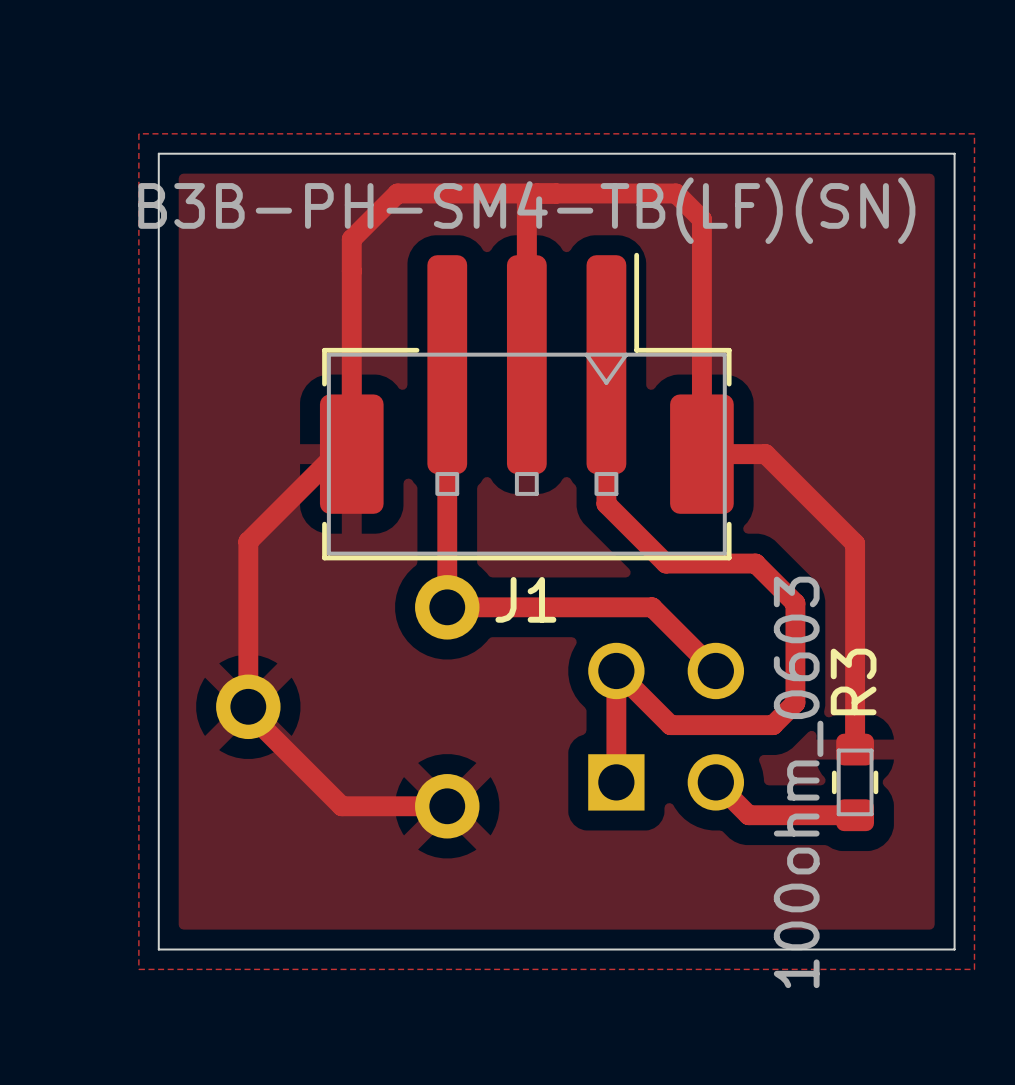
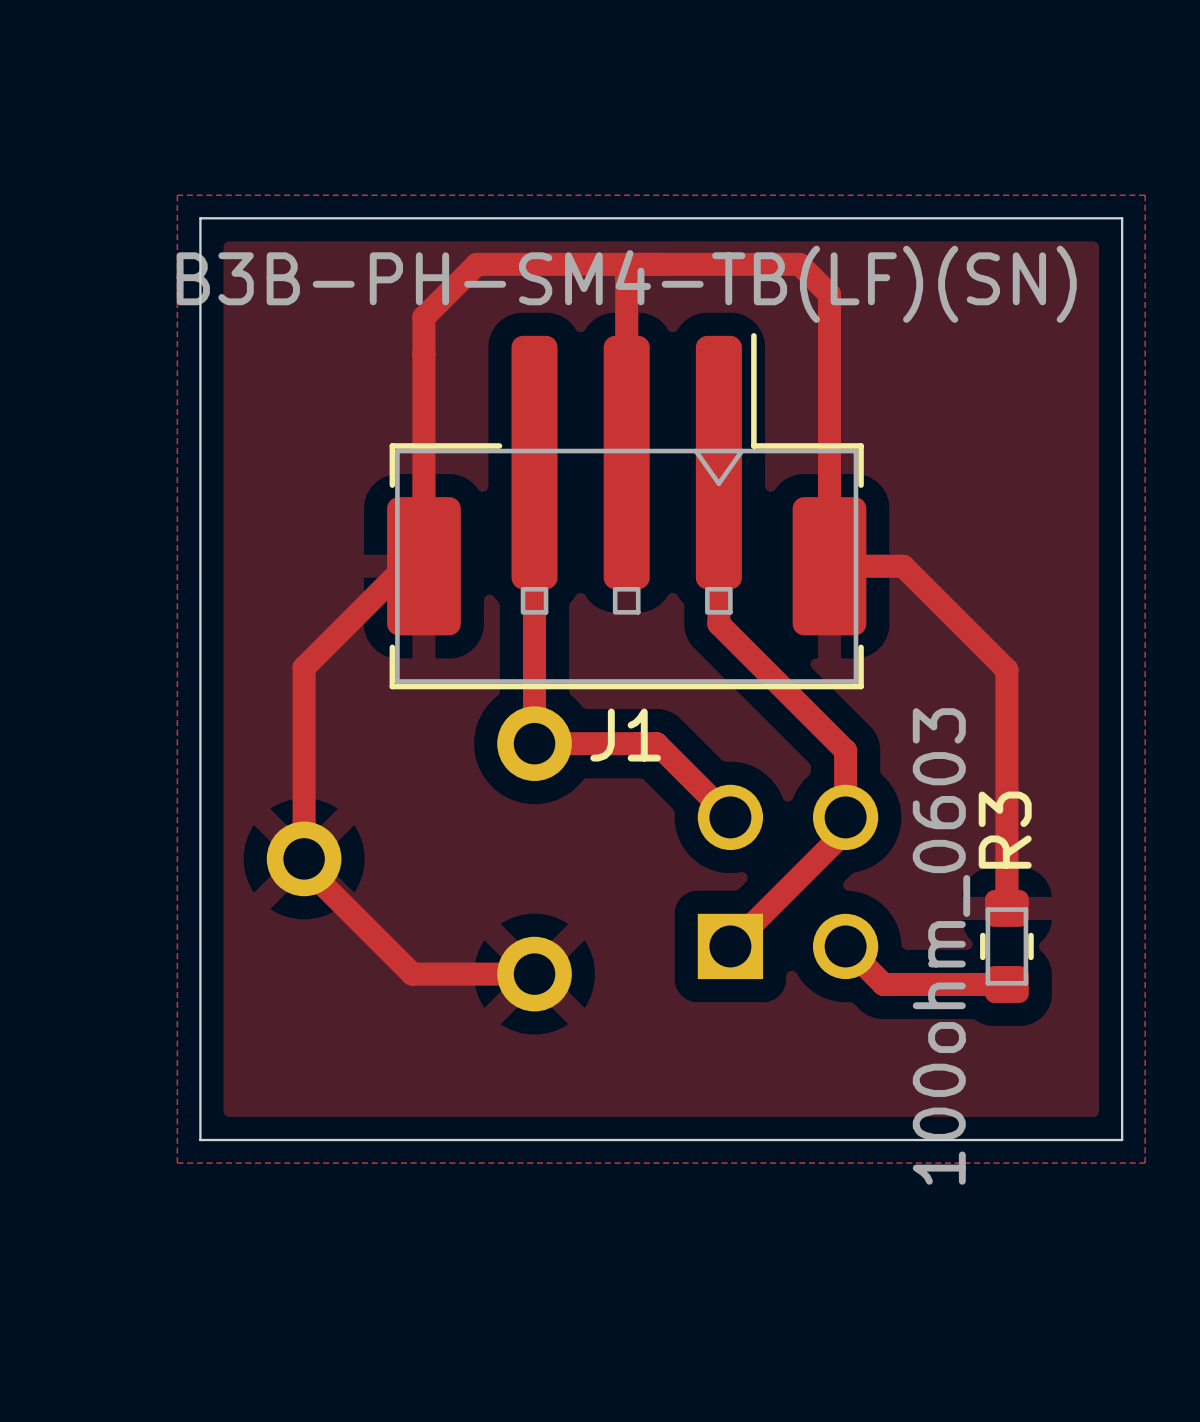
top track: (666, 563) (755, 563) (795, 603) (795, 702) (773, 725) (670, 725) (616, 670) (616, 782) -> (787, 692) (845, 750) (845, 831) (730, 946)
top track: (552, 607) (652, 607) (715, 670) -> (656, 743) (730, 817)

